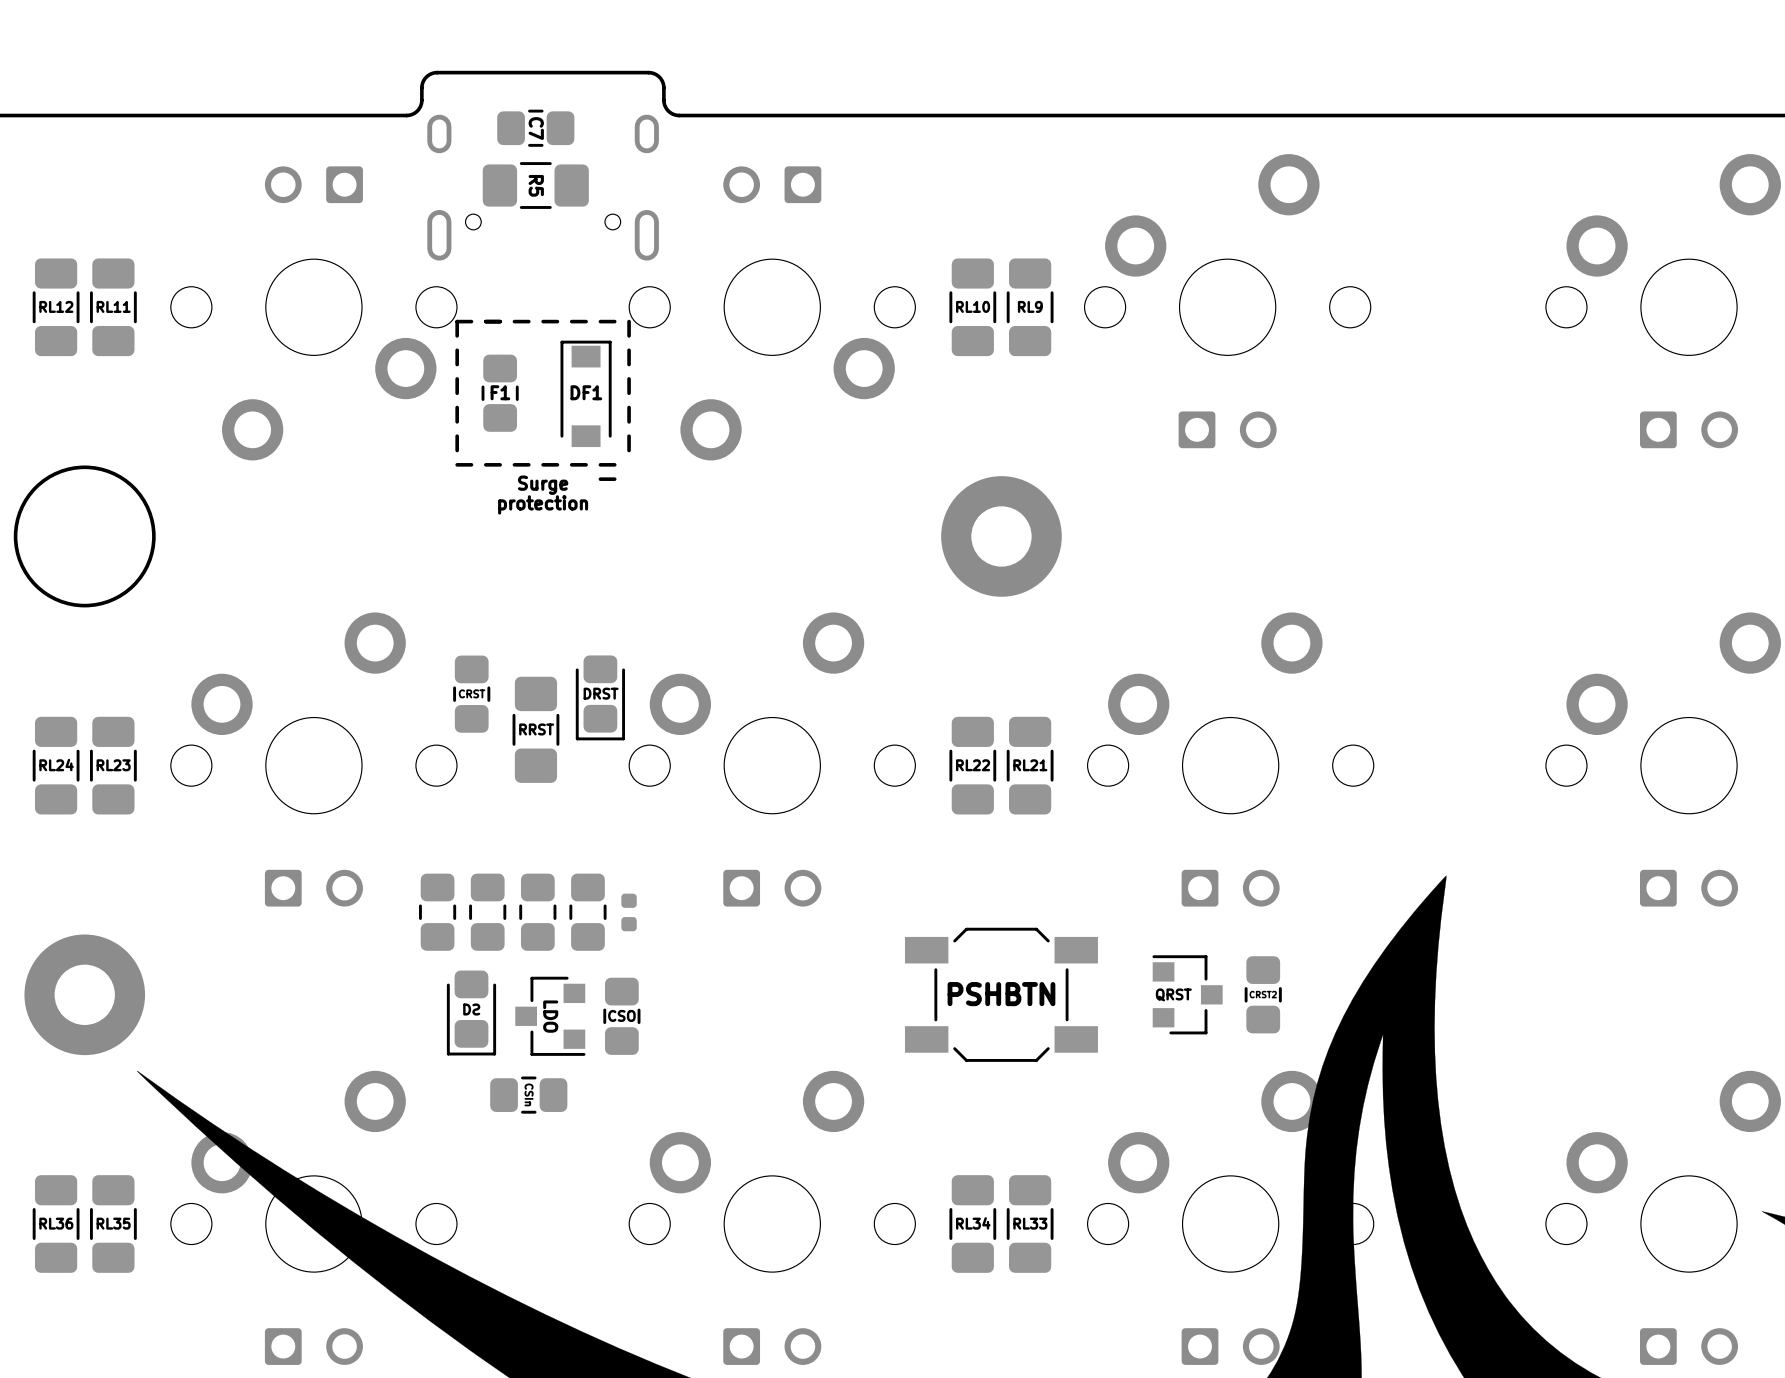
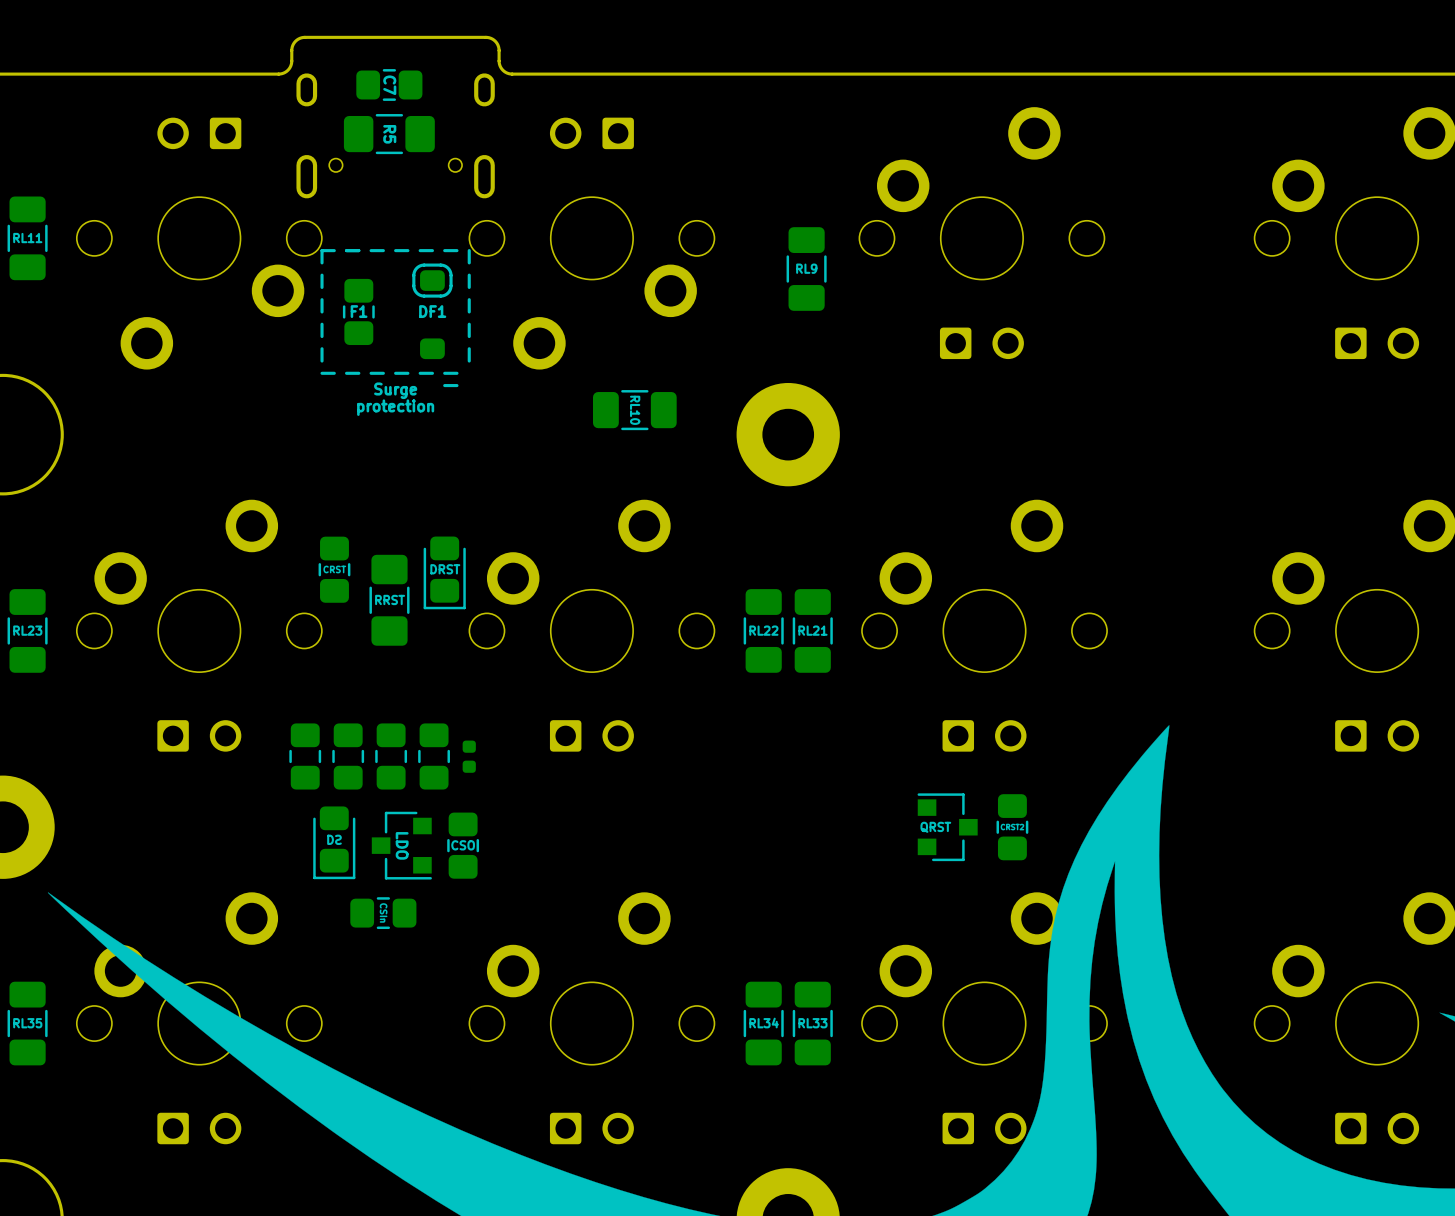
RL10 rotation: 0° (972, 307) -> 90° clockwise (634, 410)
RL10 position: (972, 307) -> (634, 410)
RL9 position: (1030, 307) -> (806, 269)
DF1 footprint: [560, 340, 612, 448] -> [412, 263, 453, 360]
part: (1001, 994) -> none
text: PSHBTN (1001, 994) -> none

